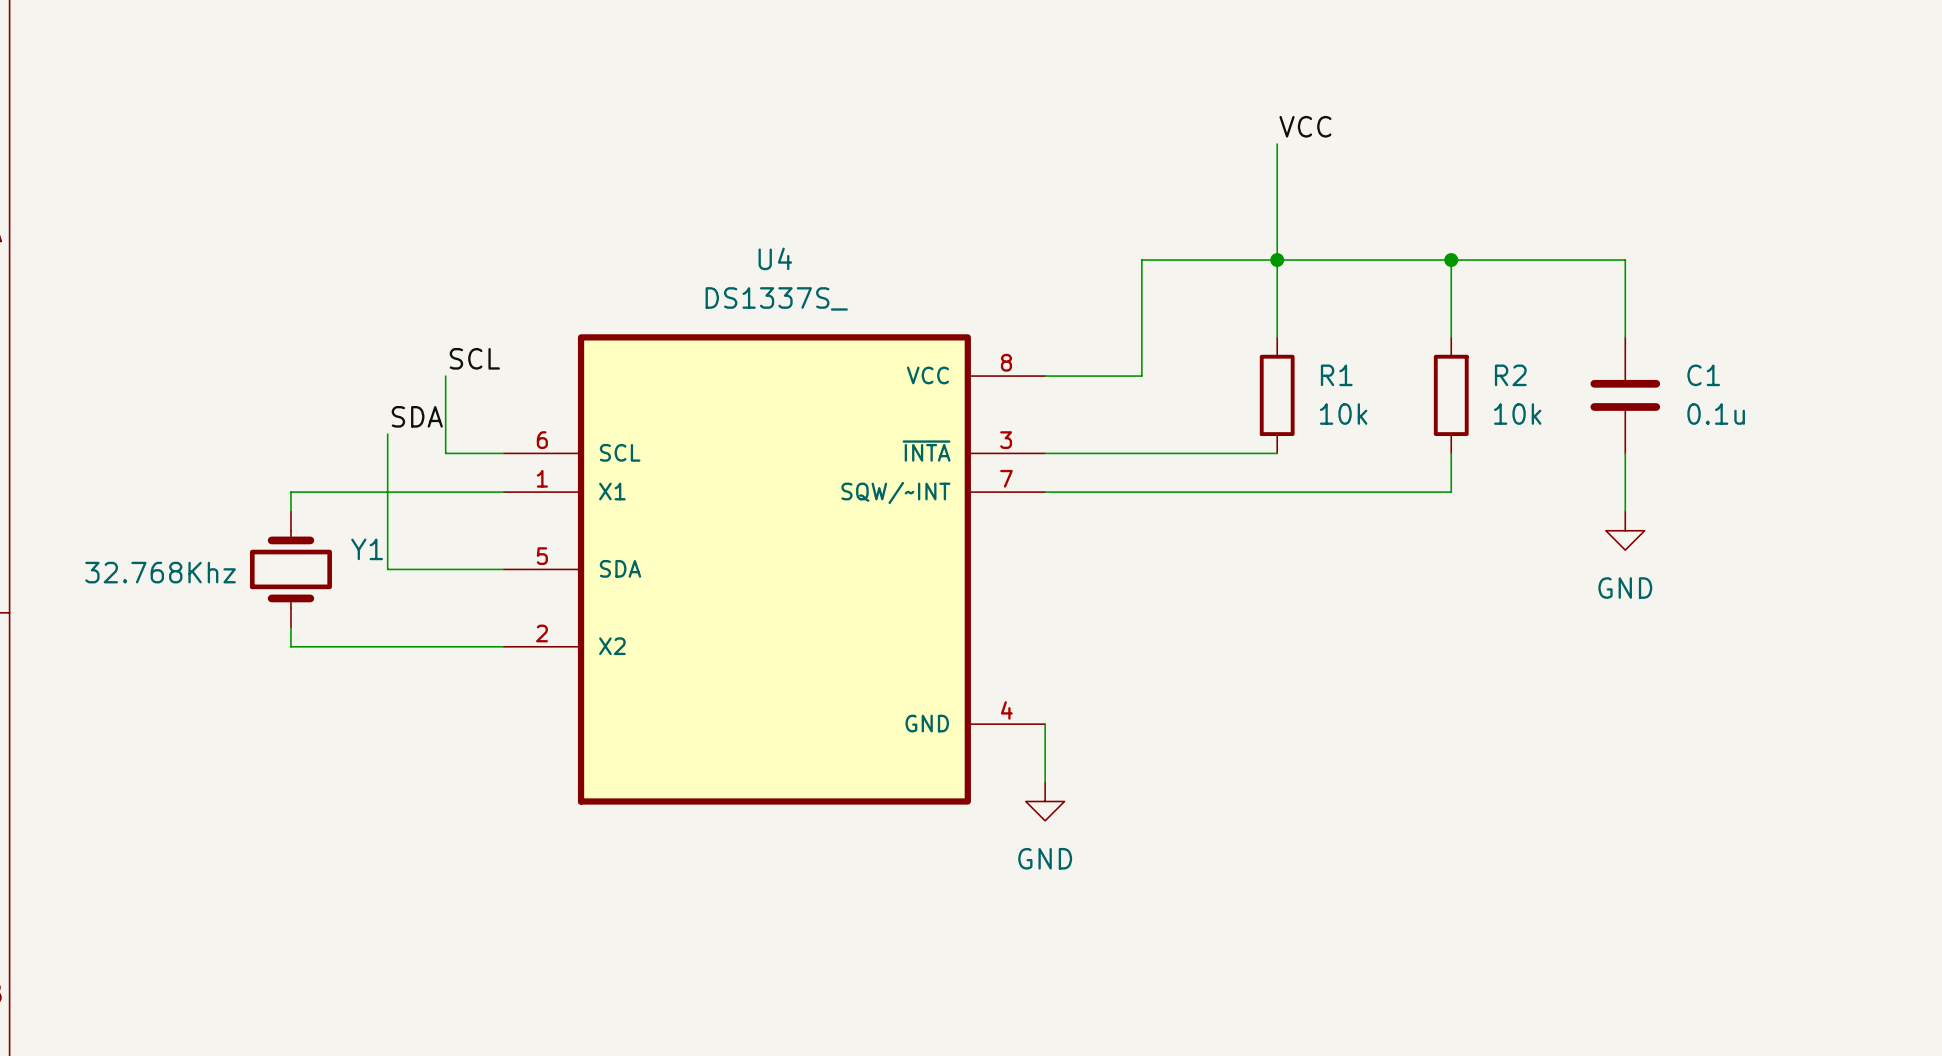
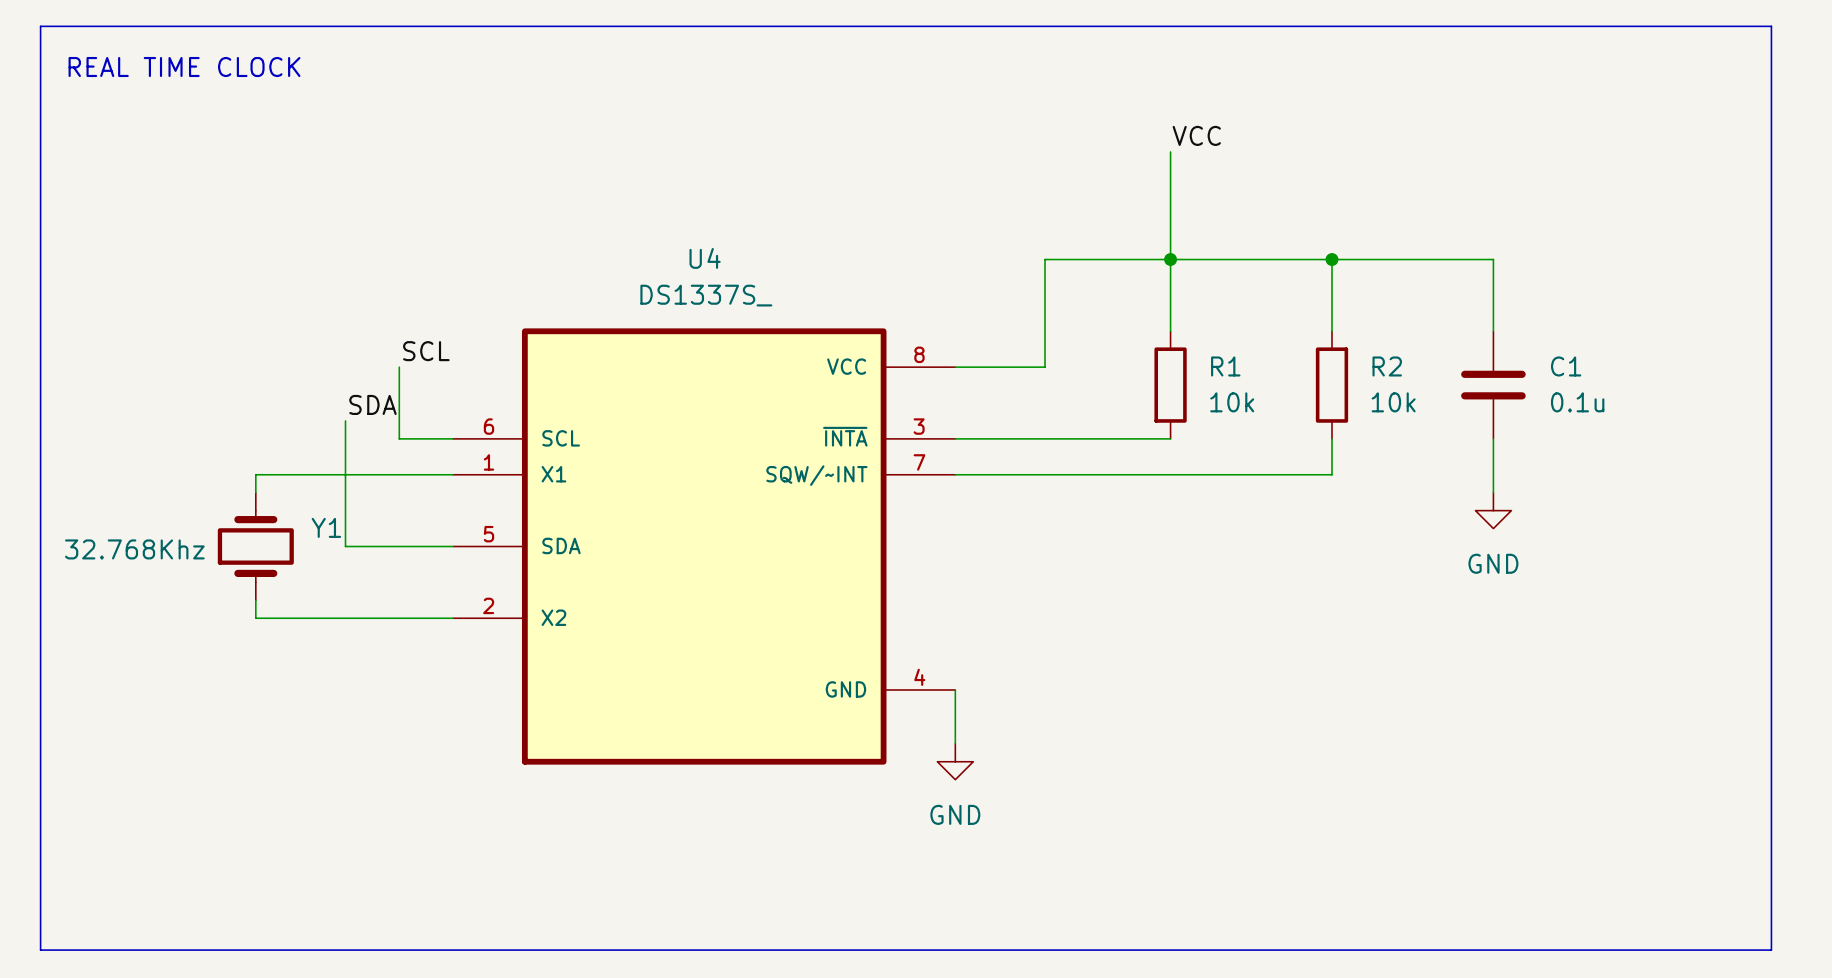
line: none -> (40, 26) (1771, 26) (1771, 950) (40, 950) (40, 26)
text: none -> REAL TIME CLOCK (184, 67)

